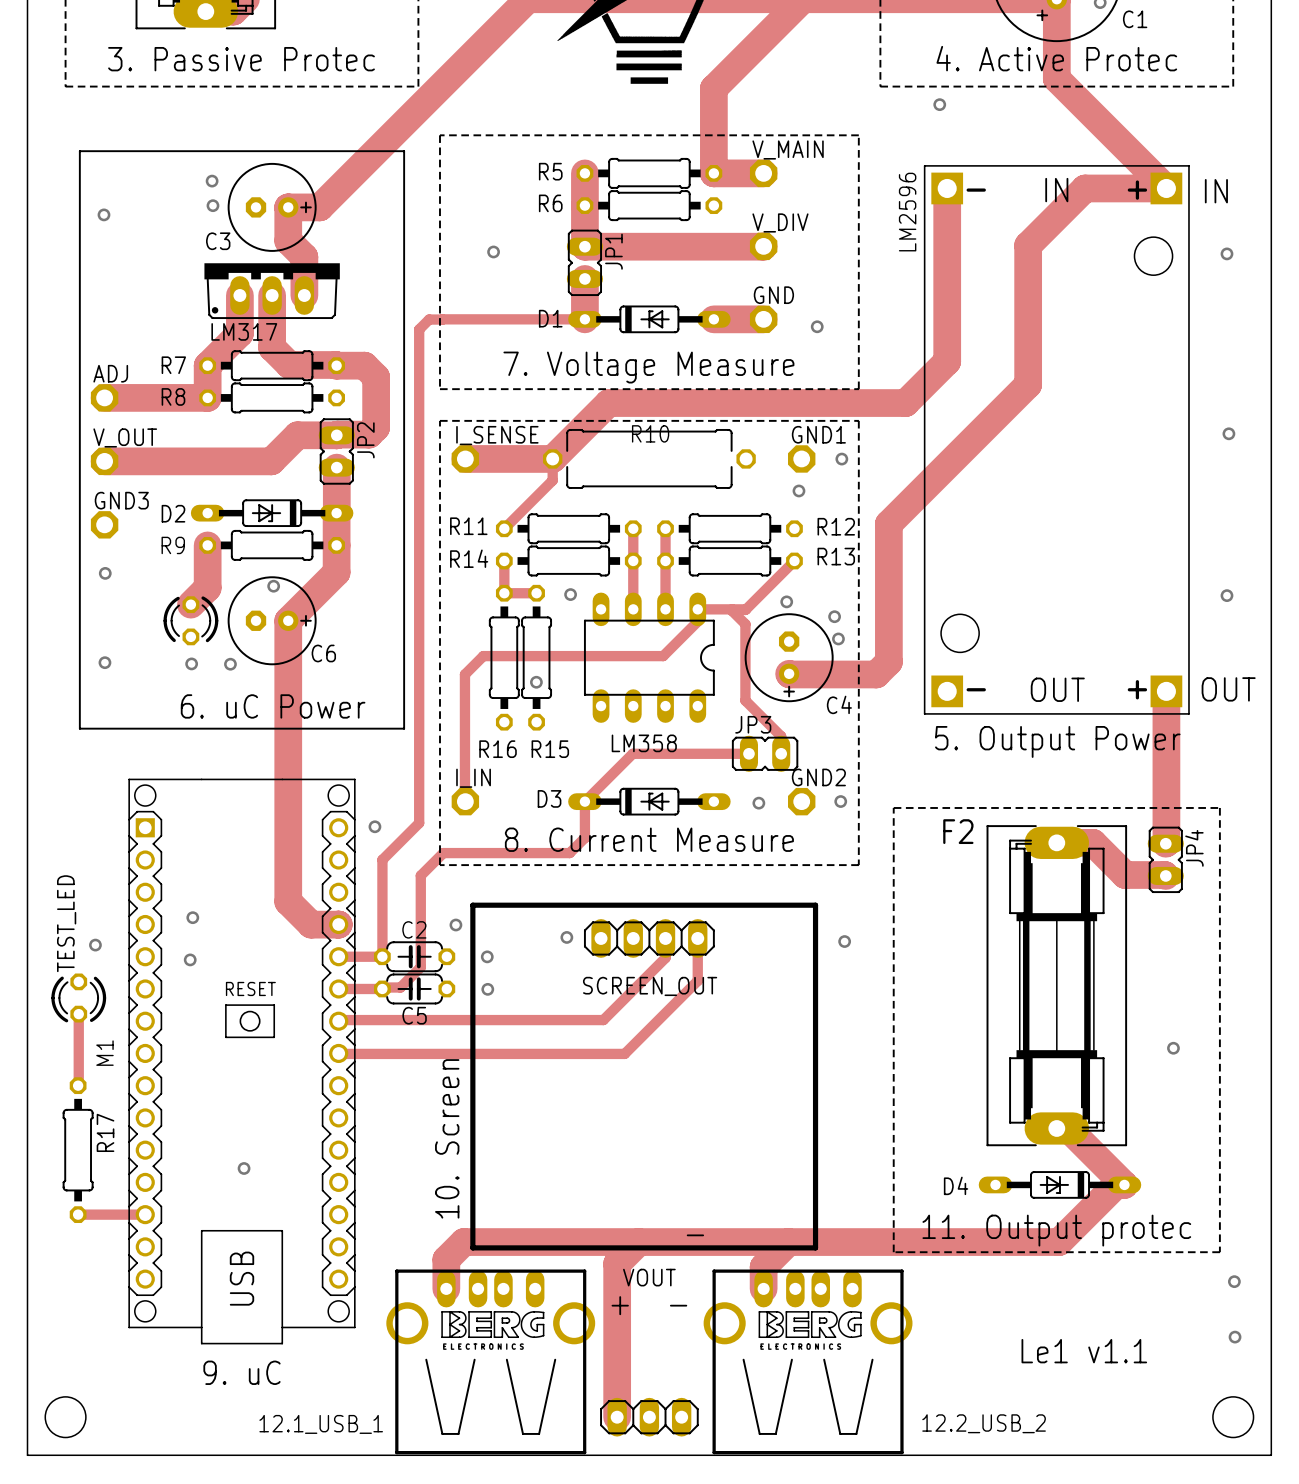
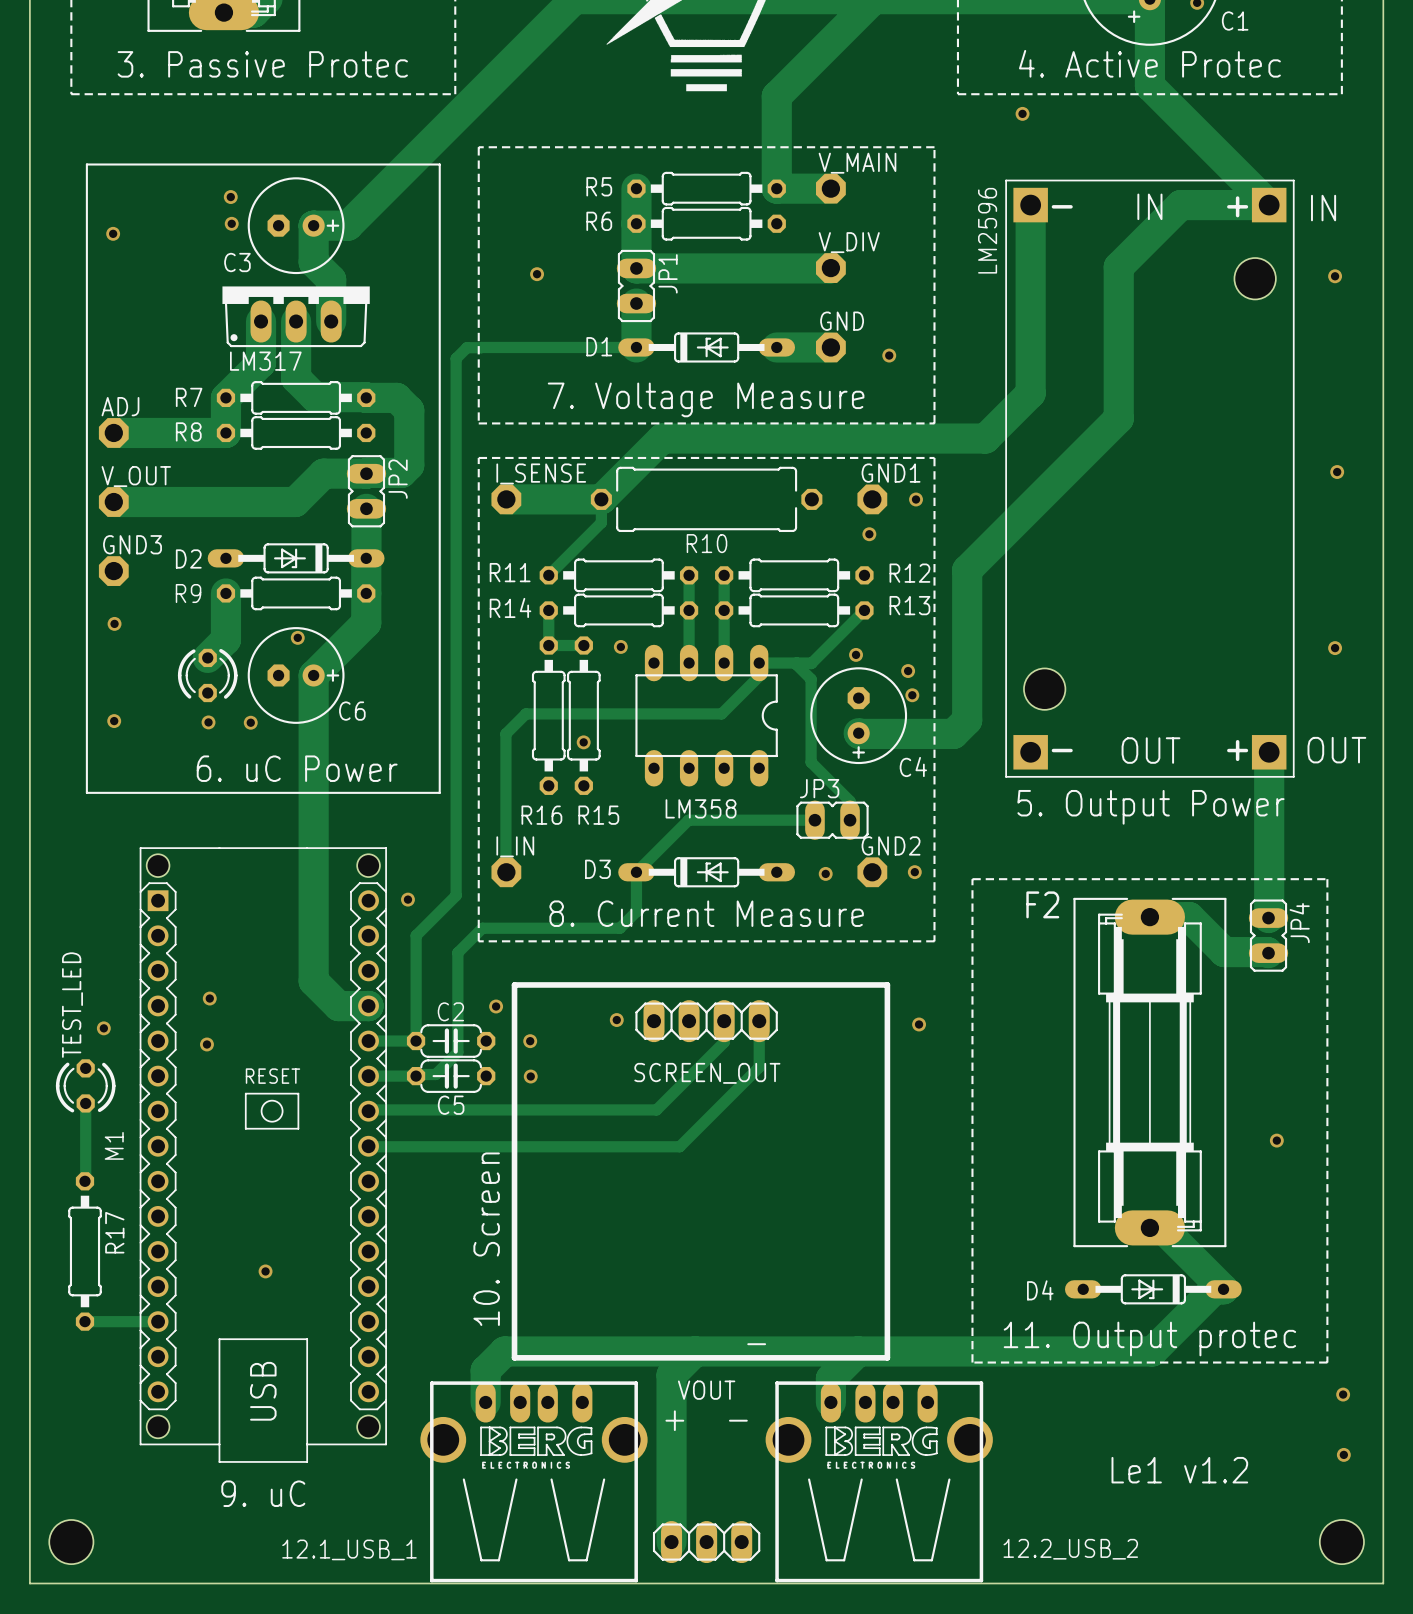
R10 name position: R10 (650, 433) -> R10 (706, 543)
text: Le1 v1.1 (1084, 1351) -> Le1 v1.2 (1179, 1470)

